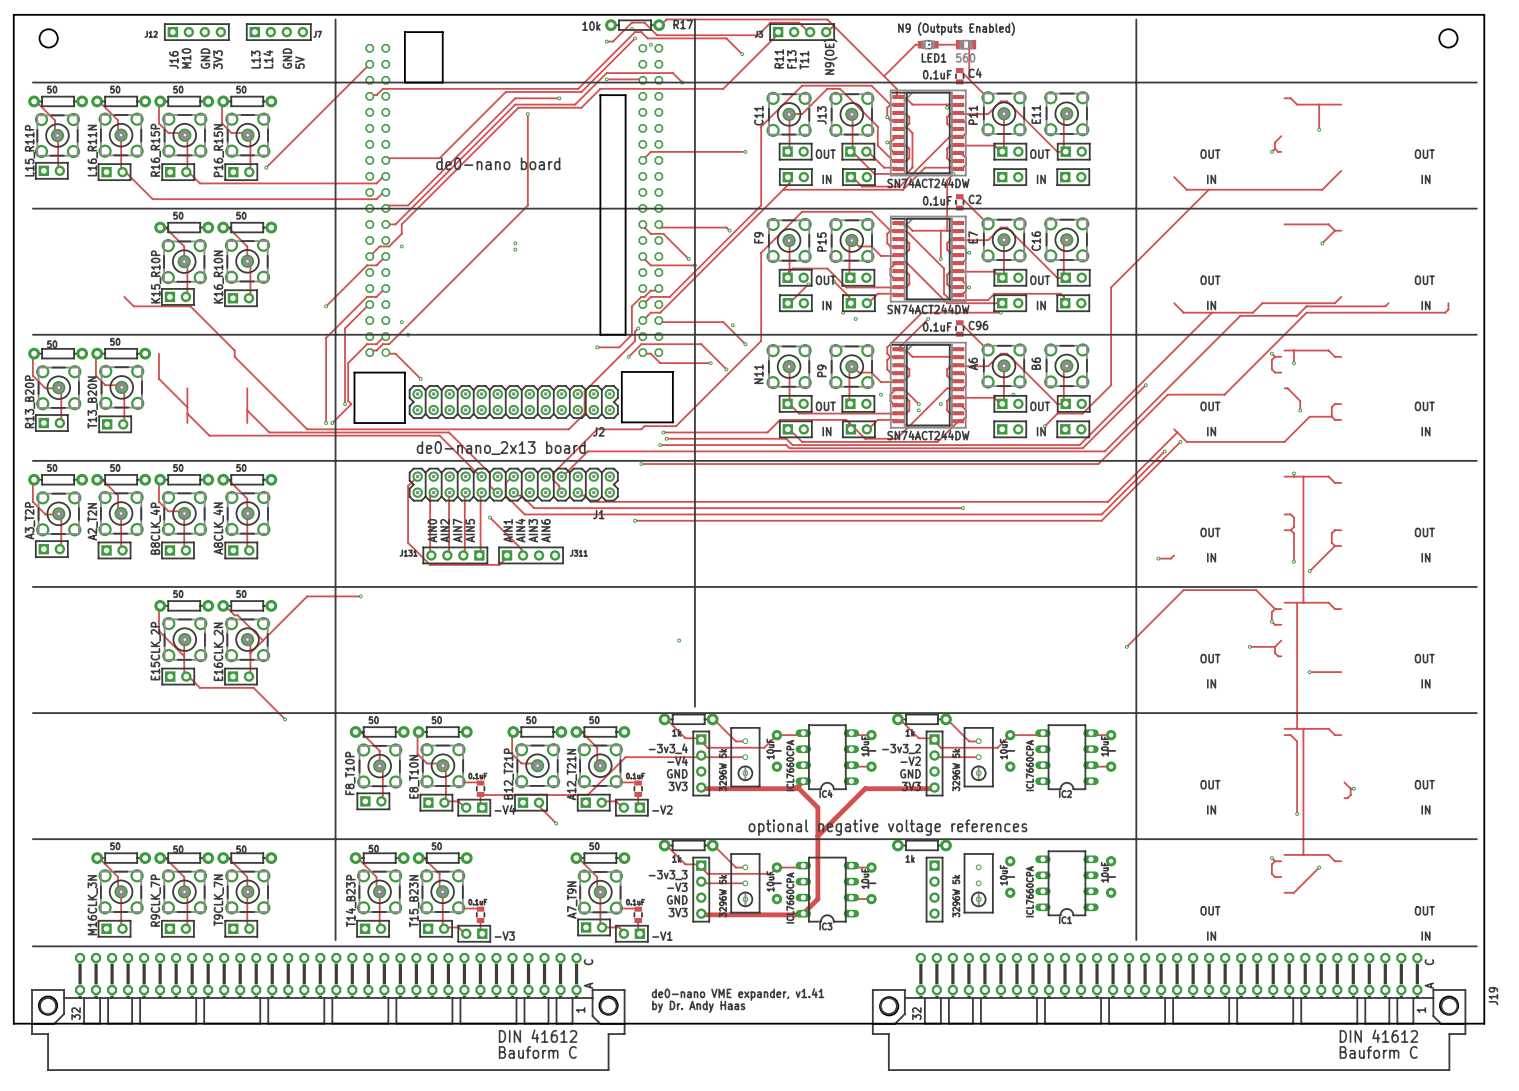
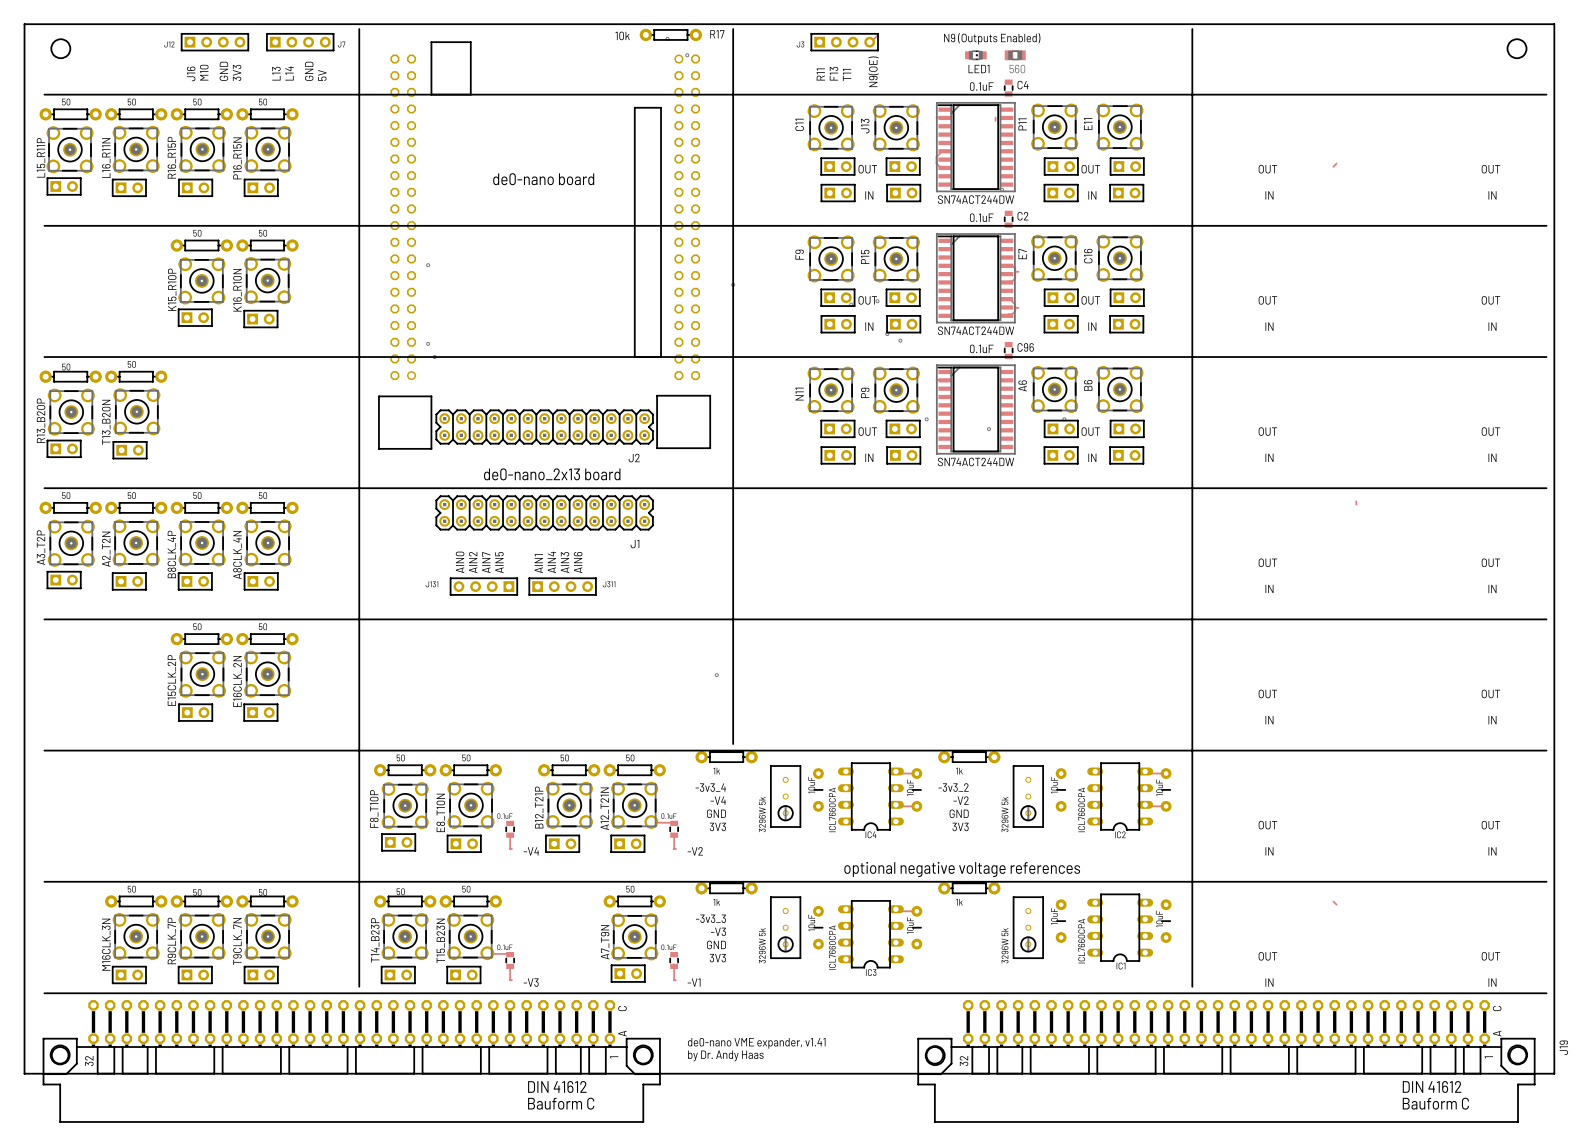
top track: (659, 25) (666, 19) (827, 19) (896, 88) (896, 95) (899, 98) (906, 98) (912, 104) (958, 104) -> none
top track: (778, 32) (780, 32) (723, 88) (600, 88) (581, 107) (518, 107) (401, 224) (401, 233) (389, 246) (379, 246) (369, 256) -> none
top track: (810, 32) (798, 22) (770, 22) (758, 35) (657, 35) (644, 22) (631, 22) (612, 41) (606, 41) -> none
top track: (635, 38) (581, 92) (505, 92) (439, 158) (385, 158) (385, 160) -> none
via: (635, 38) -> none
via: (606, 41) -> none
top track: (921, 44) (915, 44) (884, 76) -> none
top track: (934, 44) (960, 44) -> none
top track: (972, 44) (969, 44) (969, 79) -> none
top track: (742, 54) (726, 38) (647, 38) (641, 32) (635, 32) (578, 88) (382, 88) (376, 95) (369, 96) -> none
via: (742, 54) -> none
top track: (369, 64) (266, 167) -> none
top track: (959, 70) (988, 97) -> none
top track: (606, 79) (642, 80) -> none
via: (606, 79) -> none
top track: (682, 82) (672, 73) (606, 73) (575, 104) (515, 104) (395, 224) (385, 224) -> none
via: (682, 82) -> none
top track: (559, 98) (515, 98) (408, 205) (385, 205) (385, 208) -> none
via: (559, 98) -> none
top track: (1284, 98) (1290, 98) (1297, 104) (1341, 104) -> none
top track: (34, 101) (54, 120) (54, 132) (58, 136) (58, 170) (59, 170) -> none
top track: (97, 101) (118, 120) (118, 132) (121, 136) (121, 170) (124, 170) (152, 199) (376, 199) (385, 192) -> none
top track: (160, 101) (159, 123) (168, 132) (184, 132) (187, 136) (187, 170) -> none
top track: (223, 101) (222, 123) (231, 132) (247, 132) (250, 136) (249, 172) -> none
top track: (1319, 104) (1319, 129) -> none
via: (947, 107) -> none
top track: (898, 112) (906, 114) (909, 117) (909, 123) (903, 129) (898, 128) -> none
top track: (1004, 113) (1002, 151) (994, 145) (950, 145) (947, 148) (947, 158) (950, 161) (958, 161) -> none
top track: (1066, 113) (1063, 114) (1063, 148) (1065, 151) (1057, 151) (1007, 101) (1000, 101) (988, 114) (950, 114) (947, 117) (947, 123) (953, 129) (958, 128) -> none
top track: (527, 114) (527, 205) (389, 344) (382, 344) (376, 350) (370, 350) (369, 352) -> none
via: (527, 114) -> none
top track: (851, 114) (852, 148) (850, 151) (874, 173) (906, 173) (912, 167) (912, 132) (906, 126) -> none
via: (887, 117) -> none
top track: (898, 120) (890, 120) (887, 117) (887, 107) (890, 104) (871, 85) (802, 85) (761, 126) (761, 205) (669, 296) (650, 296) (642, 304) -> none
top track: (958, 120) (962, 120) (966, 123) (966, 132) (962, 136) (950, 136) (899, 186) (862, 186) (850, 177) -> none
via: (1319, 129) -> none
top track: (1281, 136) (1275, 142) (1275, 148) (1281, 151) -> none
via: (887, 142) -> none
top track: (898, 144) (906, 145) (909, 148) (909, 158) (906, 161) (893, 161) (877, 145) (877, 126) (839, 88) (827, 88) (802, 114) (789, 114) (789, 148) (787, 151) -> none
top track: (745, 151) (650, 151) (642, 160) -> none
via: (745, 151) -> none
top track: (866, 151) (884, 167) (898, 169) -> none
via: (1271, 151) -> none
top track: (958, 153) (959, 151) (966, 158) (966, 164) (962, 167) (925, 167) (903, 189) (783, 189) -> none
via: (266, 167) -> none
top track: (187, 170) (199, 183) (376, 183) (385, 176) -> none
top track: (1341, 170) (1322, 189) (1186, 189) (1174, 177) -> none
top track: (953, 173) (947, 180) (947, 230) -> none
top track: (787, 177) (789, 177) (789, 183) (660, 312) (650, 312) (642, 320) -> none
top track: (1208, 189) (1111, 287) (1111, 385) (1082, 413) (1057, 413) (1044, 426) -> none
top track: (959, 196) (988, 223) -> none
top track: (898, 223) (906, 224) (912, 230) (958, 231) -> none
top track: (642, 224) (650, 233) (663, 233) (688, 259) -> none
top track: (658, 224) (660, 227) (726, 227) (729, 230) -> none
top track: (1284, 224) (1328, 224) (1334, 230) -> none
top track: (160, 227) (165, 227) (184, 246) (184, 262) (187, 265) (185, 296) -> none
top track: (223, 227) (228, 227) (247, 246) (247, 261) (250, 262) (248, 298) -> none
via: (729, 230) -> none
top track: (890, 230) (906, 230) (944, 268) (944, 293) (950, 300) (988, 300) (994, 293) (1060, 293) (1065, 303) -> none
top track: (890, 230) (887, 233) (887, 243) (890, 246) (898, 247) -> none
top track: (890, 230) (871, 211) (802, 211) (761, 252) (761, 341) (676, 426) (644, 426) (641, 429) (597, 429) (553, 473) (553, 479) (559, 486) (559, 492) (561, 492) -> none
top track: (940, 230) (940, 259) -> none
top track: (1334, 230) (1341, 230) -> none
top track: (1334, 230) (1322, 243) -> none
top track: (898, 239) (906, 240) (909, 243) (909, 249) (903, 255) (880, 255) (871, 246) (858, 246) (851, 240) (849, 243) (850, 277) -> none
top track: (1004, 239) (1002, 277) (994, 271) (950, 271) (947, 274) (947, 284) (950, 287) (958, 287) -> none
top track: (1066, 239) (1063, 240) (1063, 274) (1065, 277) (1057, 278) (1007, 227) (1000, 227) (988, 240) (950, 240) (947, 243) (947, 249) (953, 255) (958, 255) -> none
top track: (789, 240) (789, 271) -> none
via: (515, 243) -> none
via: (1322, 243) -> none
via: (515, 249) -> none
via: (969, 252) -> none
top track: (385, 256) (376, 265) (367, 265) (326, 306) -> none
top track: (642, 256) (650, 265) (694, 265) -> none
via: (688, 259) -> none
via: (940, 259) -> none
top track: (898, 271) (906, 271) (909, 274) (909, 284) (906, 287) (846, 287) (827, 268) (792, 268) (786, 274) (787, 277) -> none
top track: (898, 279) (890, 274) (890, 268) (896, 262) (906, 262) (947, 303) (1002, 303) -> none
top track: (833, 281) (849, 296) (850, 303) -> none
top track: (808, 284) (787, 303) -> none
via: (969, 287) -> none
top track: (385, 288) (376, 296) (367, 296) (326, 337) (326, 423) -> none
top track: (658, 288) (657, 290) (650, 290) (631, 306) (631, 334) (619, 347) (597, 347) -> none
top track: (898, 295) (877, 293) (866, 303) -> none
top track: (124, 296) (133, 306) (190, 306) (234, 350) (234, 356) (307, 429) (568, 429) (584, 413) (584, 391) (635, 341) (635, 331) (638, 328) -> none
top track: (1341, 296) (1334, 303) (1262, 303) (1252, 312) (1183, 312) (1174, 303) -> none
top track: (1388, 303) (1385, 306) (1306, 306) (1297, 315) (1240, 315) (1104, 451) (587, 451) (561, 476) -> none
top track: (1448, 303) (1448, 309) (1445, 312) (1306, 312) (1224, 394) (1167, 394) (1098, 464) (641, 464) -> none
top track: (369, 304) (345, 328) (345, 404) -> none
via: (326, 306) -> none
top track: (1000, 312) (921, 312) (887, 347) (887, 353) (890, 356) (887, 359) (887, 369) (890, 372) (898, 373) -> none
via: (1000, 312) -> none
top track: (1211, 312) (1079, 445) (792, 445) (786, 438) (666, 438) -> none
top track: (928, 318) (898, 349) (906, 350) (912, 356) (958, 357) -> none
via: (928, 318) -> none
top track: (658, 320) (660, 322) (723, 322) (745, 344) -> none
top track: (959, 322) (988, 349) -> none
via: (732, 325) -> none
via: (638, 328) -> none
top track: (385, 336) (376, 344) (367, 344) (348, 363) (348, 400) (351, 404) (332, 423) -> none
via: (745, 344) -> none
via: (597, 347) -> none
top track: (1284, 350) (1328, 350) (1334, 356) (1341, 356) -> none
top track: (1293, 350) (1293, 363) -> none
top track: (385, 352) (395, 353) (420, 378) -> none
top track: (642, 352) (650, 353) (660, 363) (710, 363) -> none
top track: (34, 353) (32, 375) (45, 388) (61, 388) (59, 423) -> none
top track: (97, 353) (95, 375) (105, 385) (121, 385) (124, 388) (123, 424) -> none
top track: (159, 353) (159, 378) (187, 407) -> none
top track: (1271, 353) (1275, 356) -> none
via: (1271, 353) -> none
top track: (628, 356) (641, 344) (701, 344) (726, 369) -> none
via: (628, 356) -> none
top track: (1275, 356) (1281, 356) -> none
top track: (1275, 356) (1271, 359) (1271, 369) (1275, 372) (1281, 372) -> none
via: (710, 363) -> none
via: (1293, 363) -> none
top track: (898, 365) (906, 366) (909, 369) (909, 375) (903, 382) (880, 382) (871, 372) (858, 372) (851, 366) (849, 369) (850, 403) -> none
top track: (1004, 365) (1002, 403) (994, 397) (950, 397) (947, 400) (947, 410) (950, 413) (958, 413) -> none
top track: (1066, 365) (1063, 366) (1063, 400) (1065, 403) (1057, 404) (1007, 353) (1000, 353) (988, 366) (950, 366) (947, 369) (947, 375) (953, 382) (958, 381) -> none
top track: (789, 366) (789, 400) (787, 403) (798, 413) (906, 413) (909, 410) (909, 400) (906, 397) (898, 397) -> none
via: (726, 369) -> none
top track: (958, 373) (962, 372) (966, 375) (966, 385) (958, 389) (947, 388) (896, 438) (865, 438) (846, 419) (780, 419) (767, 432) (663, 432) -> none
via: (420, 378) -> none
top track: (1145, 385) (1082, 448) (789, 448) (786, 445) (660, 445) -> none
via: (1145, 385) -> none
top track: (187, 388) (187, 423) -> none
top track: (247, 388) (247, 423) -> none
top track: (1284, 388) (1287, 388) (1300, 400) (1300, 410) -> none
via: (345, 404) -> none
top track: (918, 404) (903, 388) (896, 388) (890, 394) (890, 400) (898, 405) -> none
via: (918, 404) -> none
top track: (1341, 404) (1334, 404) (1331, 407) (1331, 416) -> none
top track: (958, 405) (959, 404) (966, 410) (966, 416) (958, 421) (937, 441) (802, 441) (787, 429) -> none
top track: (247, 410) (269, 432) (449, 432) (490, 473) (490, 486) (497, 492) -> none
via: (918, 410) -> none
via: (1300, 410) -> none
top track: (187, 413) (209, 435) (439, 435) (481, 476) -> none
top track: (1331, 416) (1334, 419) (1341, 419) -> none
top track: (1331, 416) (1309, 416) (1284, 441) (1186, 441) (1174, 429) -> none
top track: (898, 421) (877, 419) (866, 429) -> none
via: (326, 423) -> none
via: (332, 423) -> none
via: (1044, 426) -> none
via: (663, 432) -> none
top track: (1177, 432) (1107, 501) (590, 501) (584, 495) (578, 495) (577, 492) -> none
via: (666, 438) -> none
top track: (1180, 441) (1101, 520) (635, 520) -> none
via: (1180, 441) -> none
via: (660, 445) -> none
top track: (1164, 451) (1101, 514) (524, 514) (505, 495) (505, 482) (513, 476) -> none
via: (1164, 451) -> none
via: (641, 464) -> none
via: (1293, 473) -> none
top track: (417, 476) (408, 486) (408, 542) (430, 564) (499, 564) (508, 555) (506, 555) -> none
top track: (1284, 476) (1328, 476) (1334, 482) (1341, 482) -> none
top track: (1303, 476) (1303, 602) -> none
top track: (34, 479) (32, 501) (45, 514) (61, 514) (59, 549) -> none
top track: (97, 479) (102, 479) (118, 495) (118, 511) (121, 514) (122, 550) -> none
top track: (160, 479) (159, 501) (168, 511) (184, 511) (184, 549) (185, 550) -> none
top track: (223, 479) (228, 479) (247, 498) (247, 549) (249, 550) -> none
top track: (433, 492) (430, 495) (431, 555) -> none
top track: (449, 492) (449, 555) (447, 555) -> none
top track: (465, 492) (463, 555) -> none
top track: (481, 492) (479, 555) -> none
top track: (513, 492) (515, 495) (521, 495) (534, 508) (962, 508) -> none
via: (962, 508) -> none
top track: (1284, 514) (1290, 514) (1293, 517) (1293, 527) (1290, 530) -> none
top track: (490, 517) (521, 549) (523, 555) -> none
via: (490, 517) -> none
via: (635, 520) -> none
top track: (1284, 530) (1290, 530) -> none
top track: (1290, 530) (1293, 533) (1293, 561) -> none
top track: (1341, 530) (1334, 530) (1331, 533) (1331, 542) (1334, 545) -> none
top track: (1334, 545) (1341, 545) -> none
top track: (1334, 545) (1309, 571) -> none
top track: (1174, 555) (1171, 558) (1158, 558) -> none
via: (1158, 558) -> none
via: (1293, 561) -> none
via: (1309, 571) -> none
top track: (360, 596) (307, 596) (250, 653) -> none
via: (360, 596) -> none
top track: (1284, 602) (1328, 602) (1334, 609) (1341, 609) -> none
top track: (1297, 602) (1297, 728) -> none
top track: (160, 605) (159, 631) (184, 656) -> none
top track: (223, 605) (234, 615) (237, 615) (263, 640) -> none
top track: (1275, 609) (1271, 612) (1271, 621) (1275, 624) (1281, 624) -> none
top track: (1275, 609) (1281, 609) -> none
top track: (1275, 609) (1256, 590) (1183, 590) (1126, 646) -> none
via: (1271, 621) -> none
top track: (184, 639) (184, 675) (187, 675) (199, 687) (253, 687) (285, 719) -> none
top track: (247, 639) (250, 640) (248, 676) -> none
top track: (1281, 640) (1275, 646) -> none
via: (1126, 646) -> none
top track: (1249, 646) (1275, 646) -> none
via: (1249, 646) -> none
top track: (1275, 646) (1275, 653) (1281, 656) -> none
top track: (1309, 672) (1341, 672) -> none
via: (1309, 672) -> none
via: (285, 719) -> none
top track: (664, 719) (685, 738) (701, 738) (701, 741) (707, 747) (764, 747) (776, 735) (802, 735) (803, 733) -> none
top track: (712, 719) (735, 741) (745, 741) -> none
top track: (897, 719) (918, 738) (934, 738) (934, 741) (940, 747) (997, 747) (1010, 735) (1041, 735) (1042, 733) -> none
top track: (945, 719) (969, 741) (978, 741) -> none
top track: (1284, 728) (1328, 728) (1334, 735) (1341, 735) -> none
top track: (1303, 728) (1303, 854) -> none
top track: (355, 731) (360, 731) (379, 750) (379, 766) (382, 769) (381, 801) -> none
top track: (418, 731) (417, 754) (426, 763) (442, 763) (445, 766) (445, 801) -> none
top track: (513, 731) (512, 754) (521, 763) (537, 763) (537, 765) -> none
top track: (576, 731) (581, 731) (597, 747) (597, 763) (600, 765) -> none
top track: (1284, 735) (1290, 735) (1297, 741) (1297, 813) -> none
top track: (934, 755) (934, 757) (978, 757) -> none
top track: (745, 757) (625, 757) (587, 795) (480, 795) -> none
part: (701, 763) -> none
part: (934, 763) -> none
top track: (458, 781) (480, 783) -> none
top track: (803, 781) (795, 788) (701, 787) -> none
top track: (1344, 782) (1350, 788) -> none
top track: (797, 787) (817, 807) (817, 899) (802, 914) (701, 913) -> none
top track: (934, 787) (865, 788) (817, 836) -> none
top track: (1350, 788) (1350, 795) (1344, 798) -> none
via: (1353, 788) -> none
top track: (445, 801) (458, 801) (466, 807) -> none
top track: (539, 802) (537, 804) (556, 823) -> none
top track: (601, 802) (616, 801) (623, 807) -> none
part: (474, 807) -> none
part: (631, 807) -> none
via: (1297, 813) -> none
via: (556, 823) -> none
top track: (664, 845) (685, 864) (701, 864) (701, 867) (707, 873) (770, 873) (776, 867) (802, 867) (803, 865) -> none
top track: (712, 845) (735, 867) (745, 867) -> none
top track: (1284, 854) (1328, 854) (1334, 861) (1341, 861) -> none
top track: (97, 858) (118, 877) (118, 889) (121, 892) (122, 928) -> none
top track: (160, 858) (165, 858) (184, 877) (184, 891) (187, 892) (185, 928) -> none
top track: (223, 858) (228, 858) (247, 877) (247, 927) (249, 928) -> none
top track: (355, 858) (376, 877) (376, 889) (379, 892) (381, 928) -> none
top track: (418, 858) (423, 858) (439, 873) (439, 889) (442, 892) (442, 927) (458, 927) (466, 933) -> none
top track: (576, 858) (597, 877) (597, 889) (600, 892) -> none
via: (1271, 858) -> none
top track: (1281, 861) (1275, 861) (1271, 864) (1271, 873) (1275, 877) (1281, 877) -> none
top track: (1319, 867) (1293, 892) (1284, 892) -> none
via: (1319, 867) -> none
top track: (701, 881) (701, 883) (745, 883) -> none
part: (701, 889) -> none
part: (934, 889) -> none
top track: (600, 892) (600, 927) (619, 927) (623, 933) -> none
top track: (851, 897) (871, 899) -> none
top track: (616, 908) (638, 909) -> none
part: (474, 933) -> none
part: (631, 933) -> none

